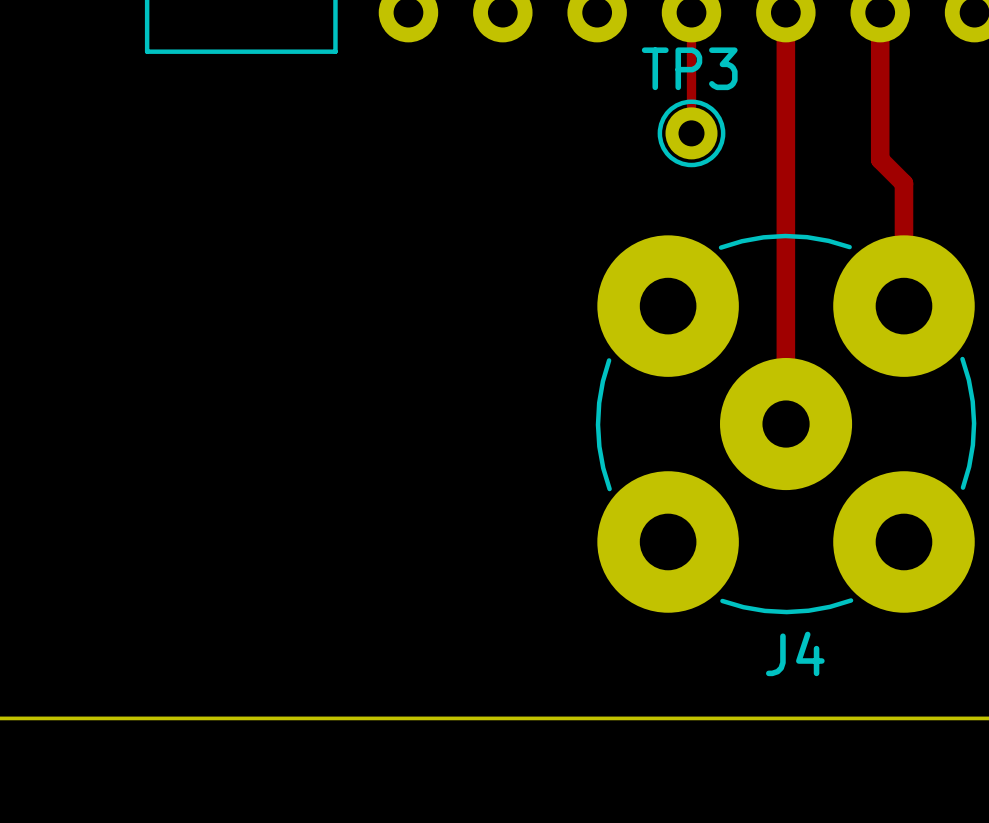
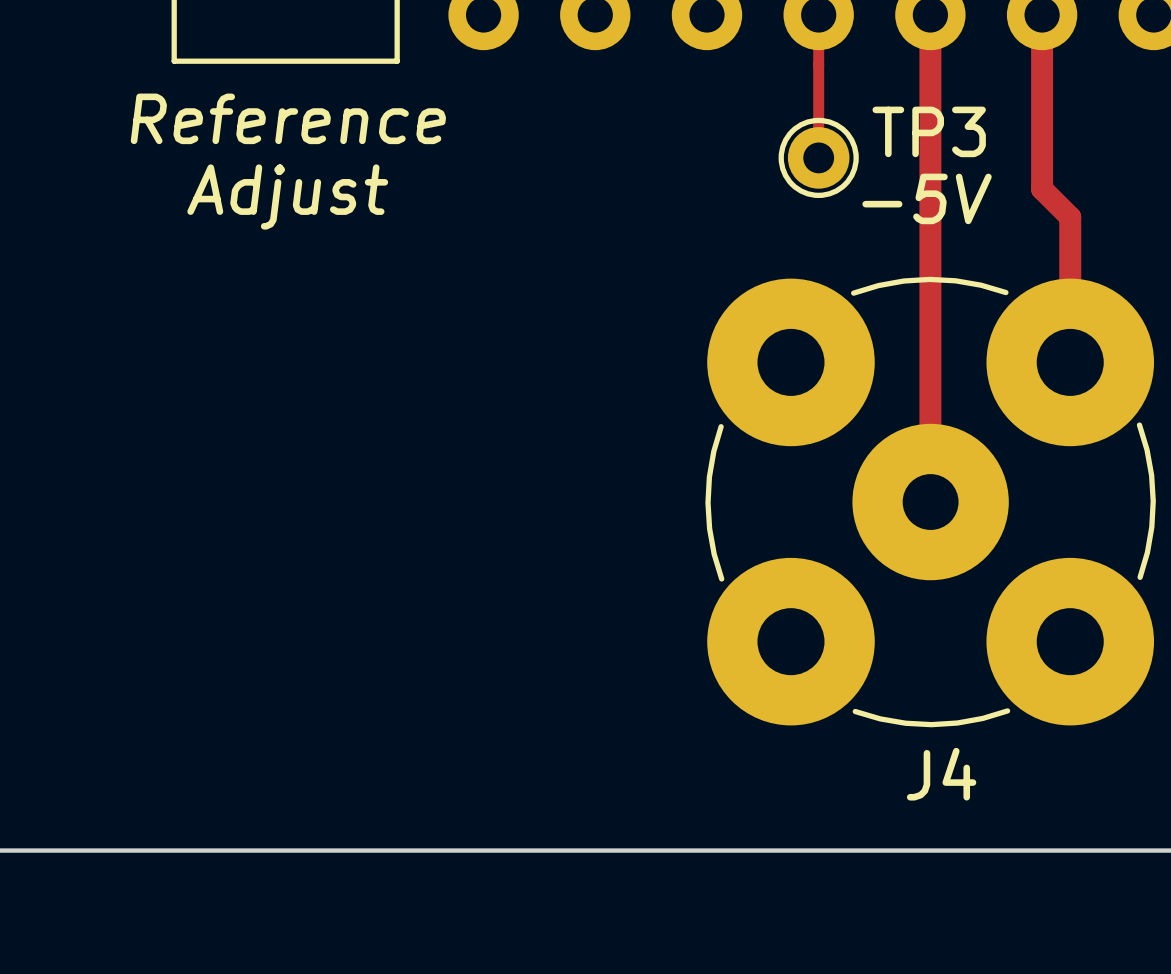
TP3 name position: TP3 (689, 68) -> TP3 (929, 131)
text: none -> Reference (288, 118)
text: none -> Adjust (287, 196)
text: none -> -5V (927, 198)

